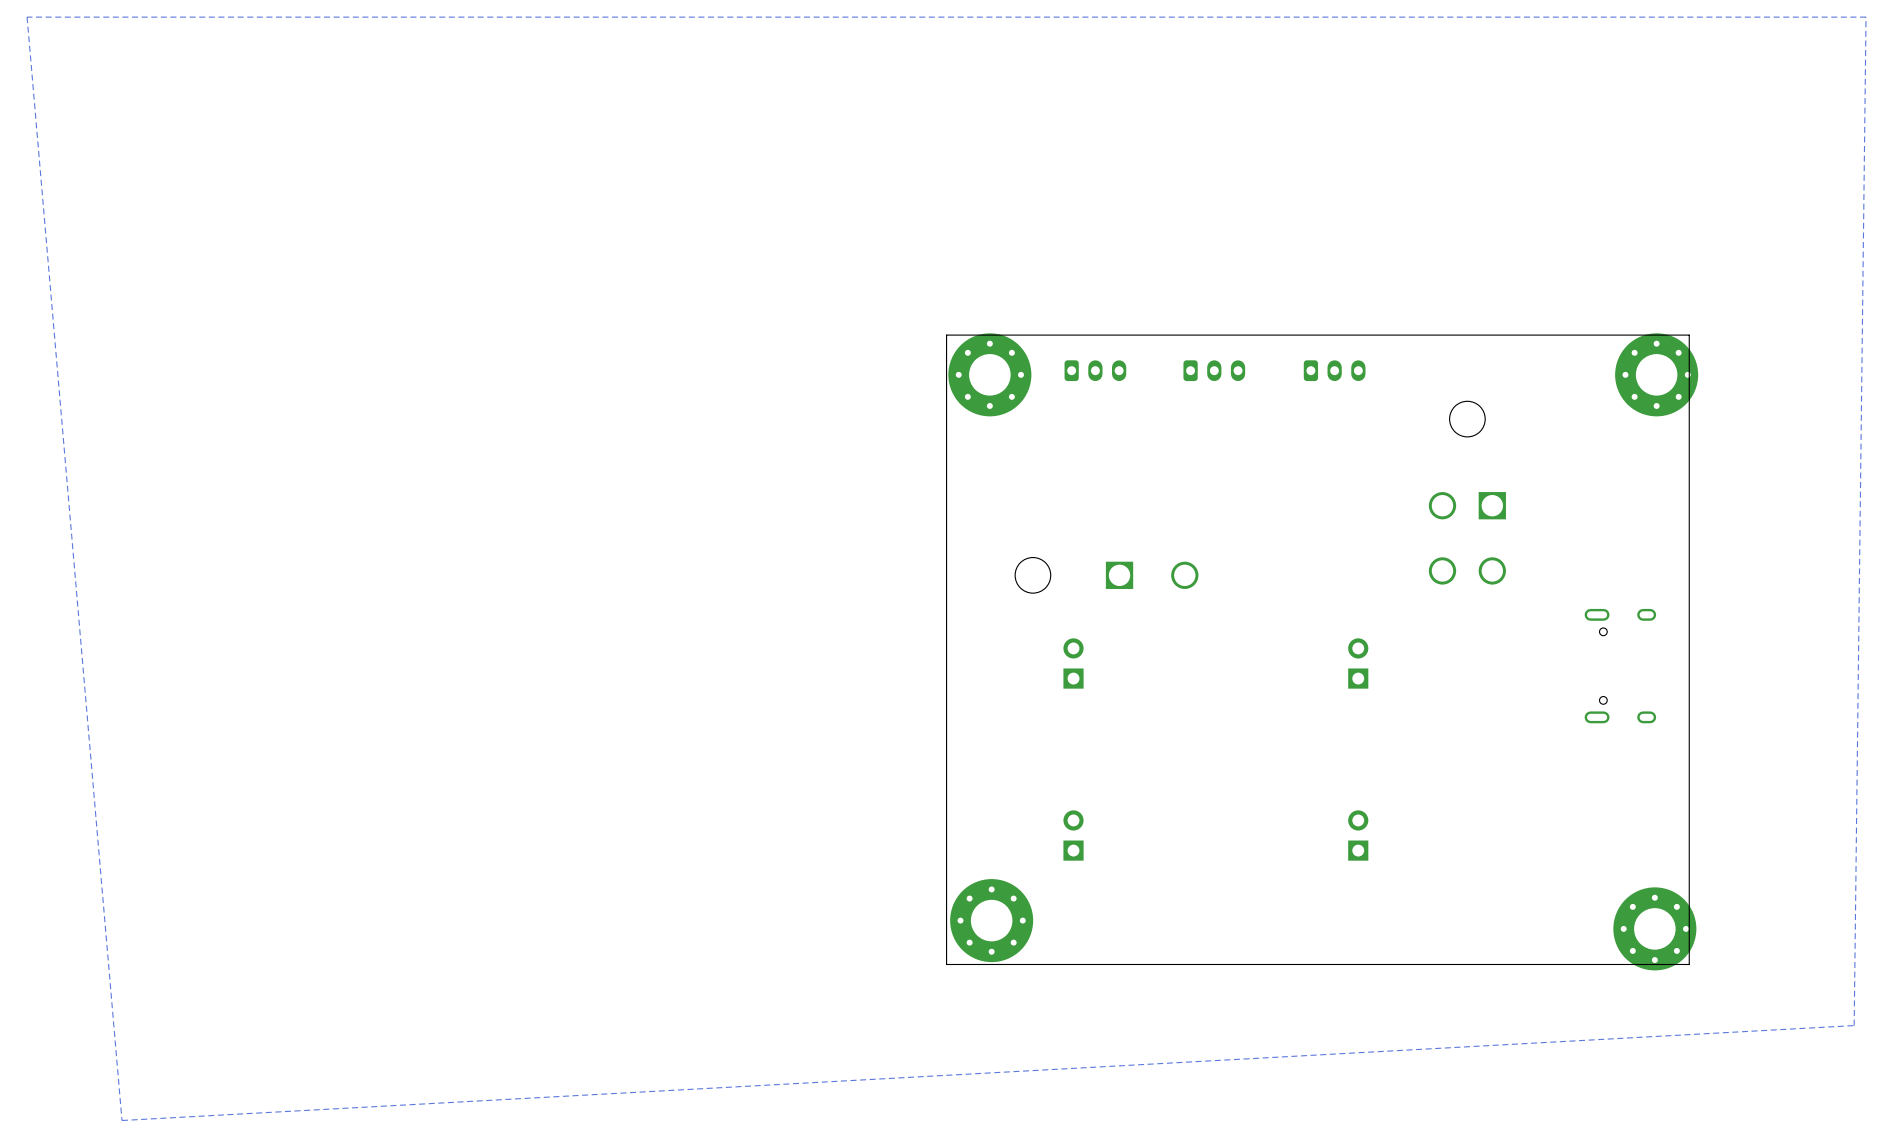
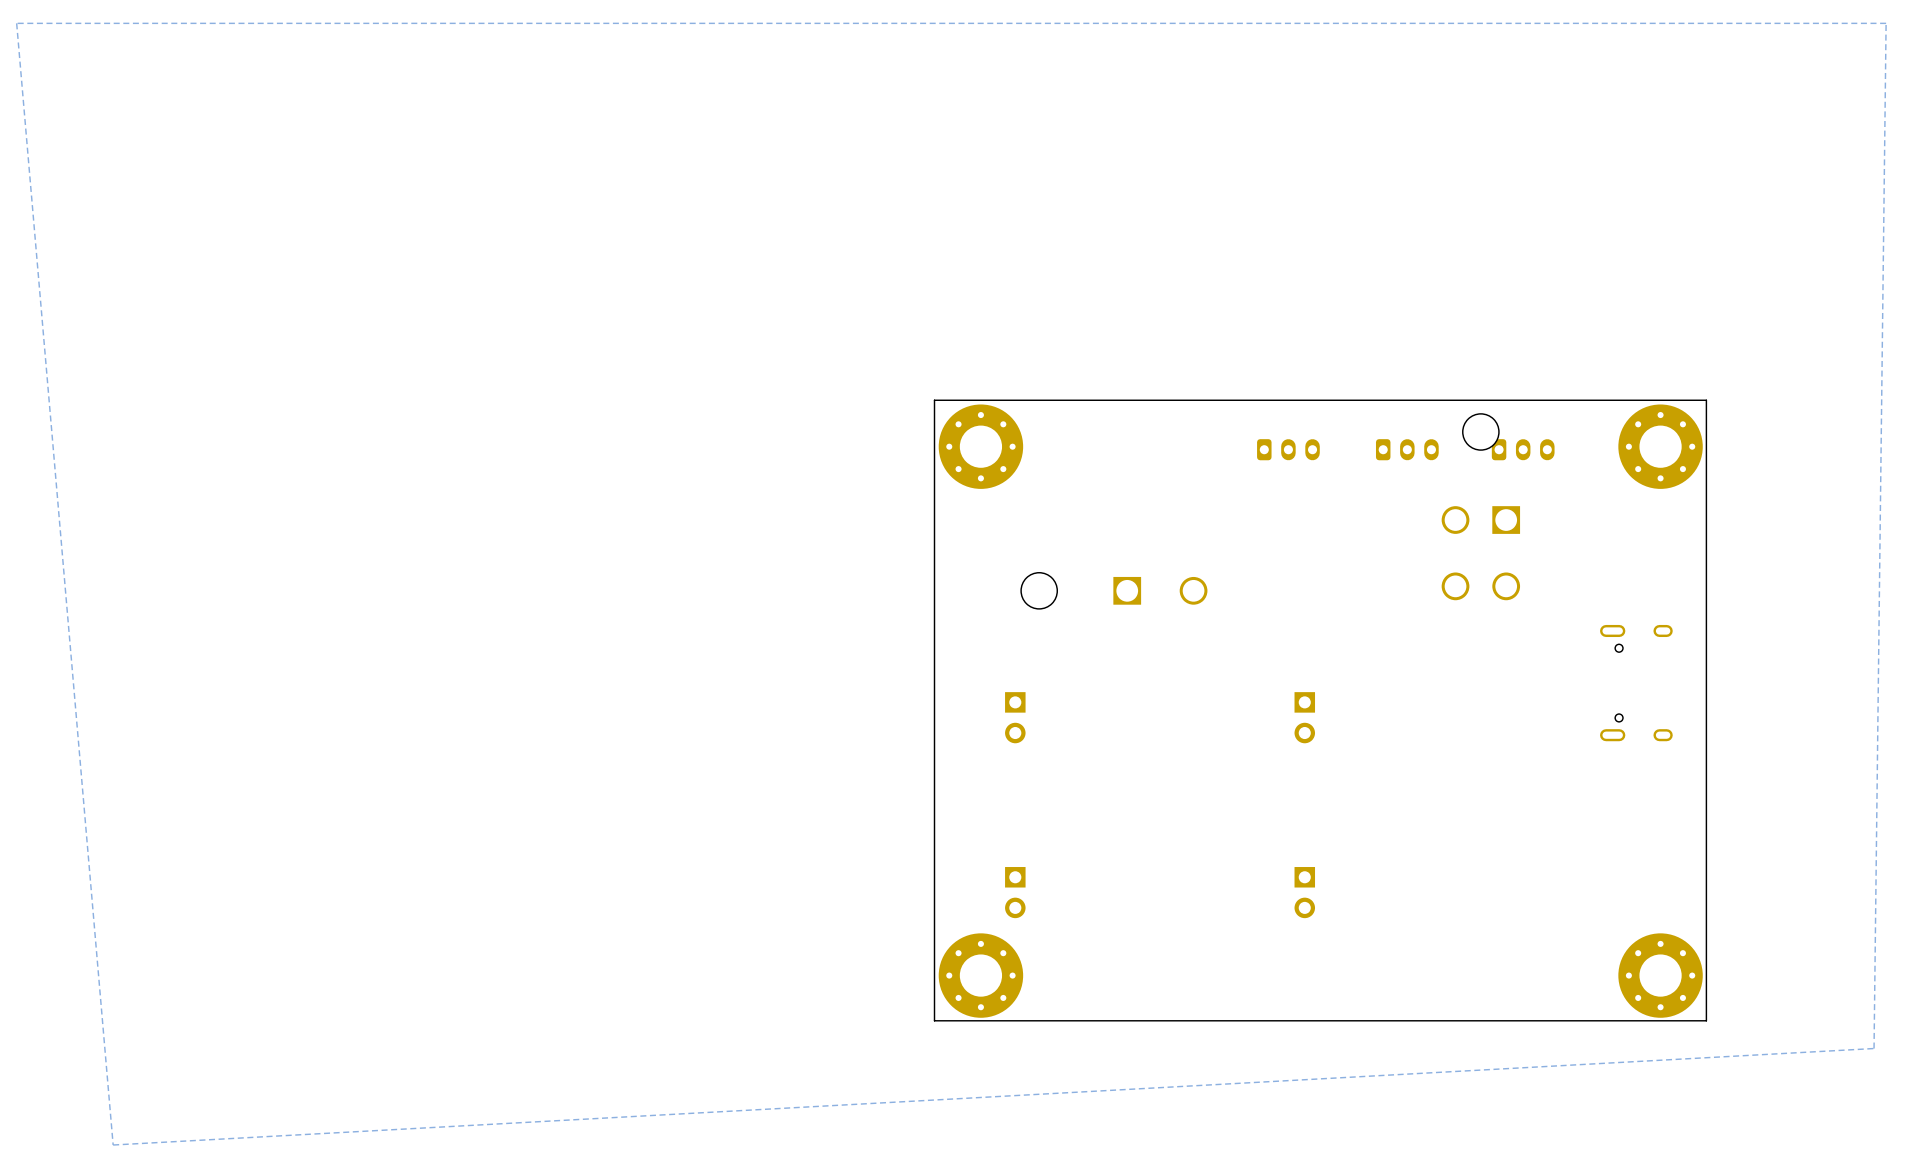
part: (1095, 370) -> none
part: (1214, 370) -> none
part: (1334, 370) -> none
part position: (989, 374) -> (980, 446)
part position: (1656, 374) -> (1660, 446)
board edge: (1689, 387) (1689, 335) (946, 335) (946, 964) (1689, 964) -> (1706, 400) (934, 400) (934, 1020) (1706, 1020) (1706, 986)
part: none -> (1288, 449)
part: none -> (1407, 449)
part: none -> (1523, 449)
part rotation: 0° (1073, 663) -> 180° (1015, 717)
part position: (1073, 663) -> (1015, 717)
part rotation: 0° (1358, 663) -> 180° (1304, 717)
part position: (1358, 663) -> (1304, 717)
part rotation: 0° (1073, 835) -> 180° (1015, 892)
part position: (1073, 835) -> (1015, 892)
part rotation: 0° (1358, 835) -> 180° (1304, 892)
part position: (1358, 835) -> (1304, 892)
part position: (991, 920) -> (980, 975)
part position: (1654, 928) -> (1660, 975)

